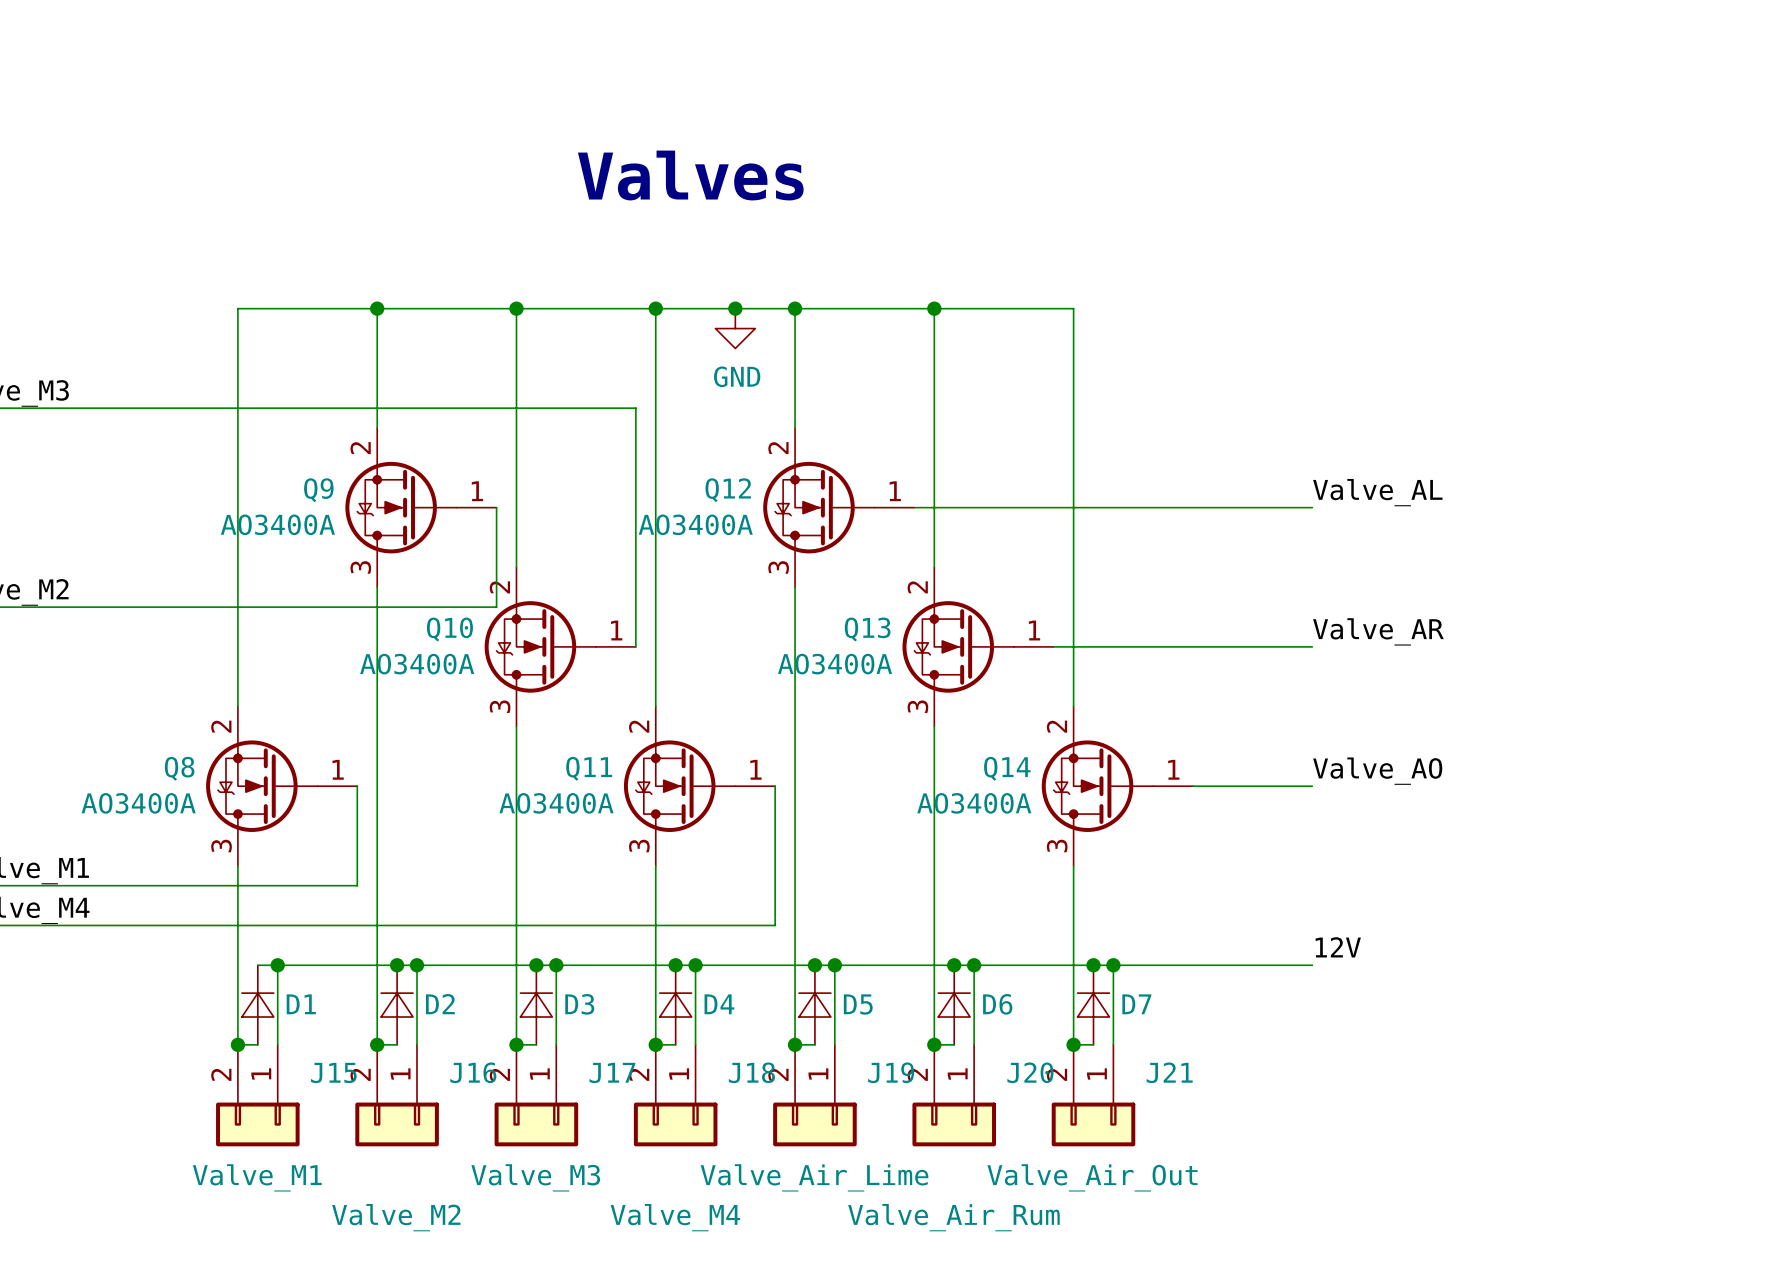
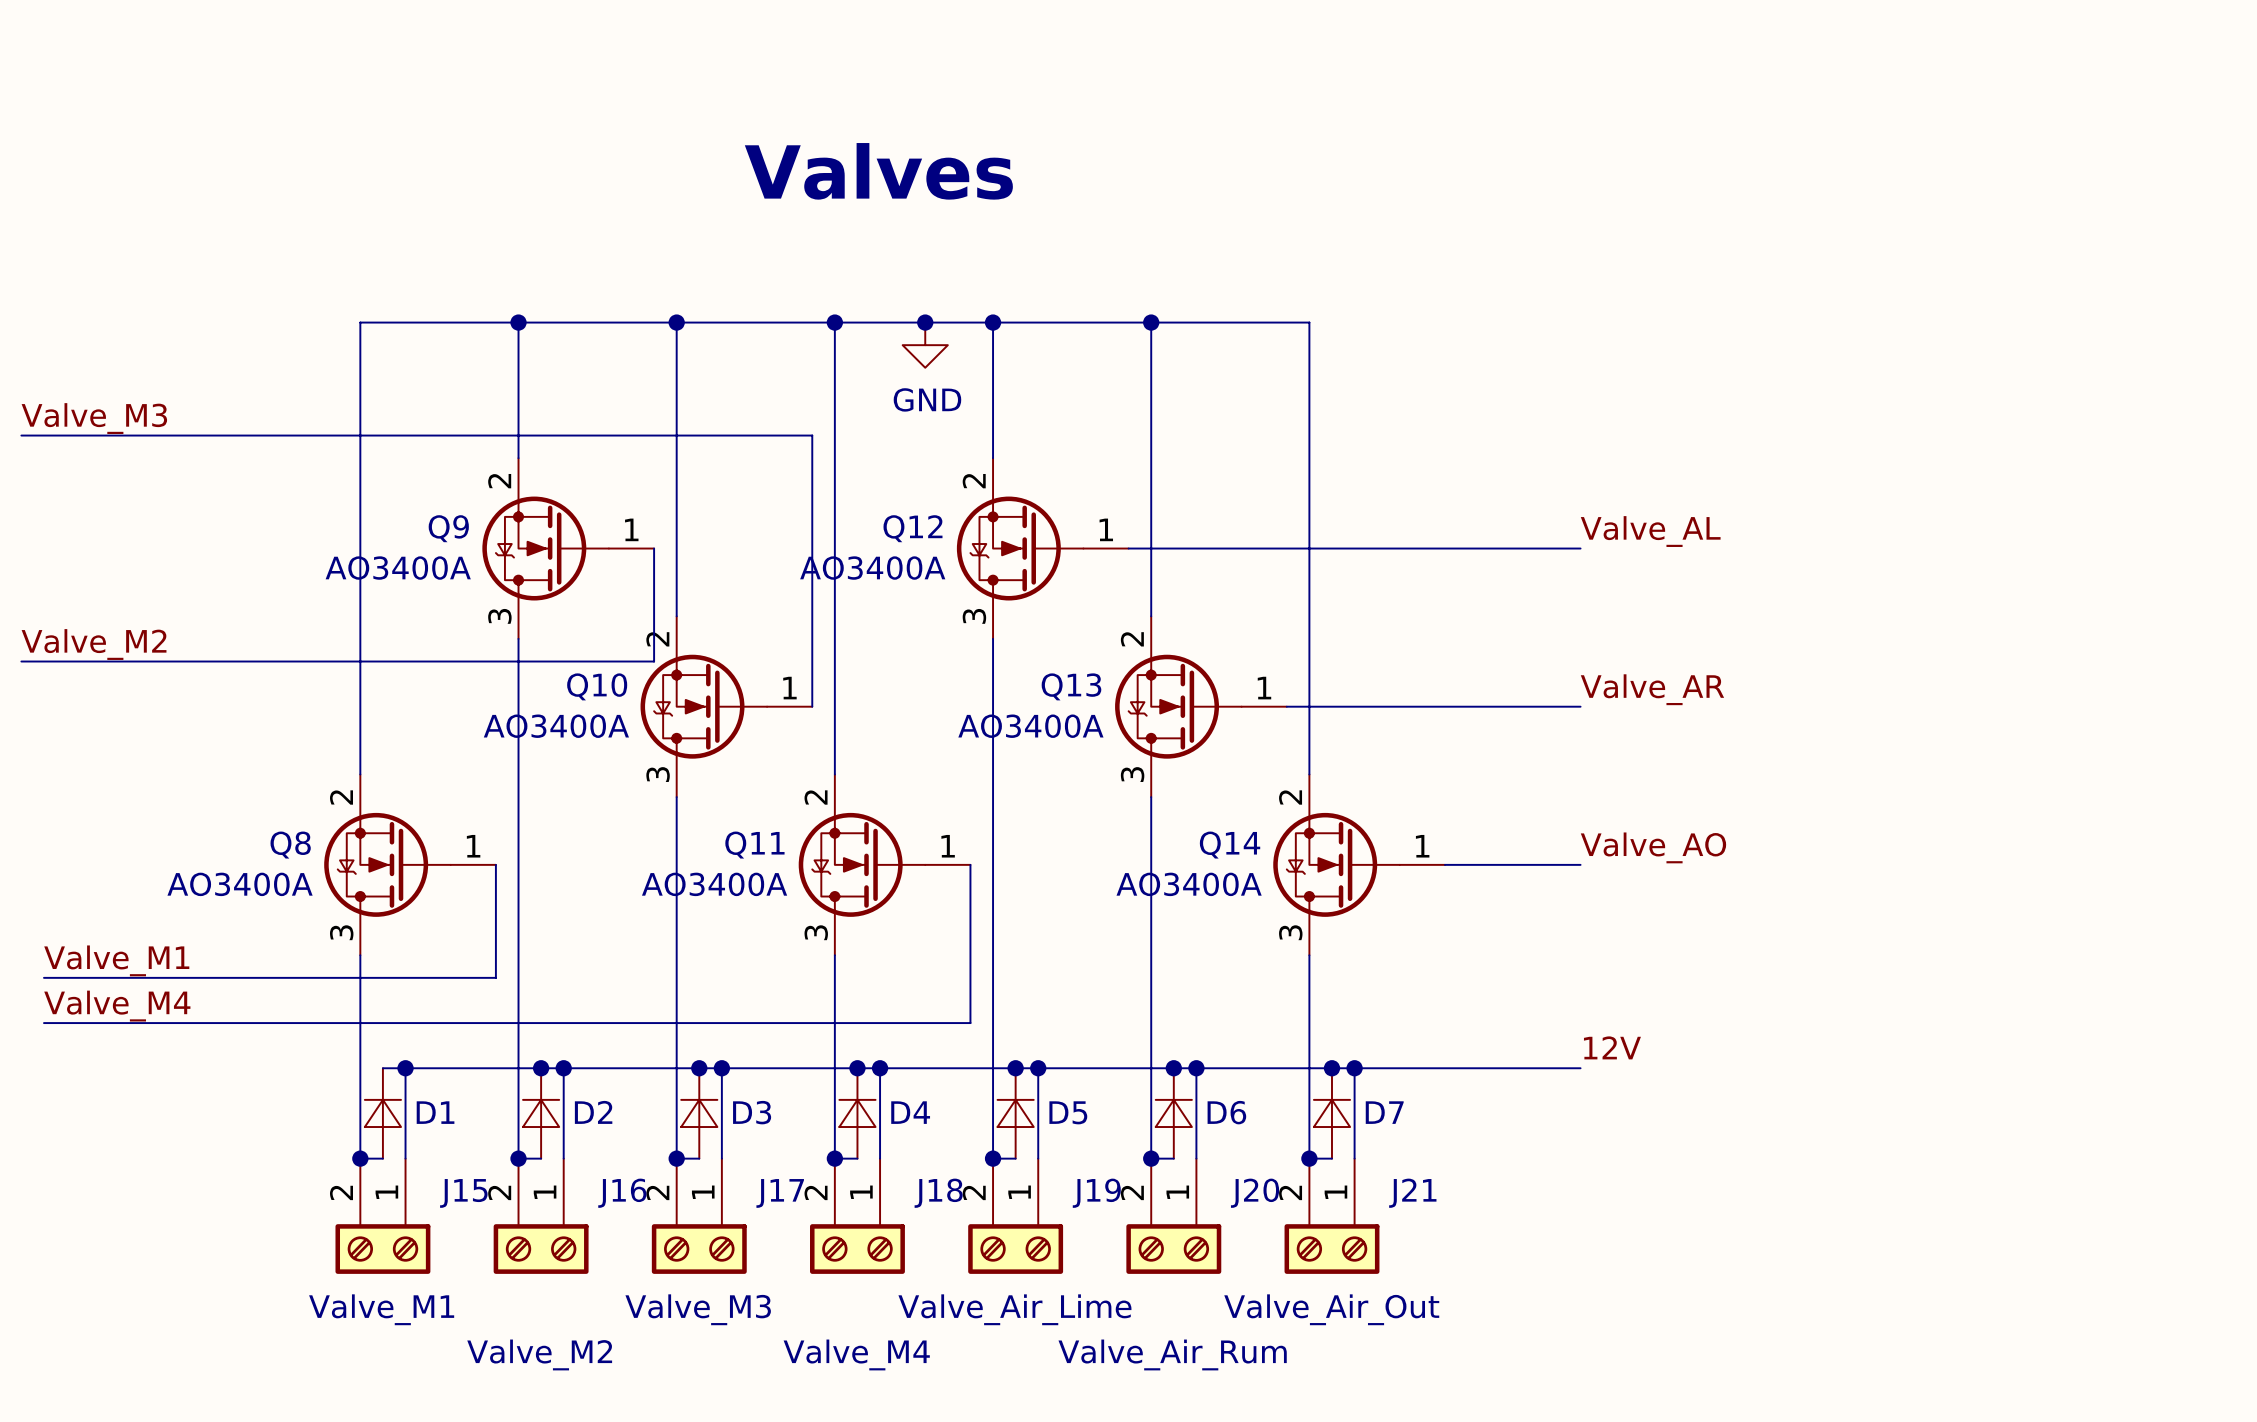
J15 symbol: [216, 1044, 300, 1147] -> [335, 1158, 431, 1274]
J16 symbol: [355, 1044, 439, 1147] -> [493, 1158, 589, 1274]
J17 symbol: [494, 1044, 579, 1147] -> [651, 1158, 747, 1274]
J18 symbol: [633, 1044, 718, 1147] -> [810, 1158, 905, 1274]
J19 symbol: [773, 1044, 857, 1147] -> [968, 1158, 1064, 1274]
J20 symbol: [912, 1044, 997, 1147] -> [1126, 1158, 1222, 1274]
J21 symbol: [1051, 1044, 1136, 1147] -> [1284, 1158, 1380, 1274]

